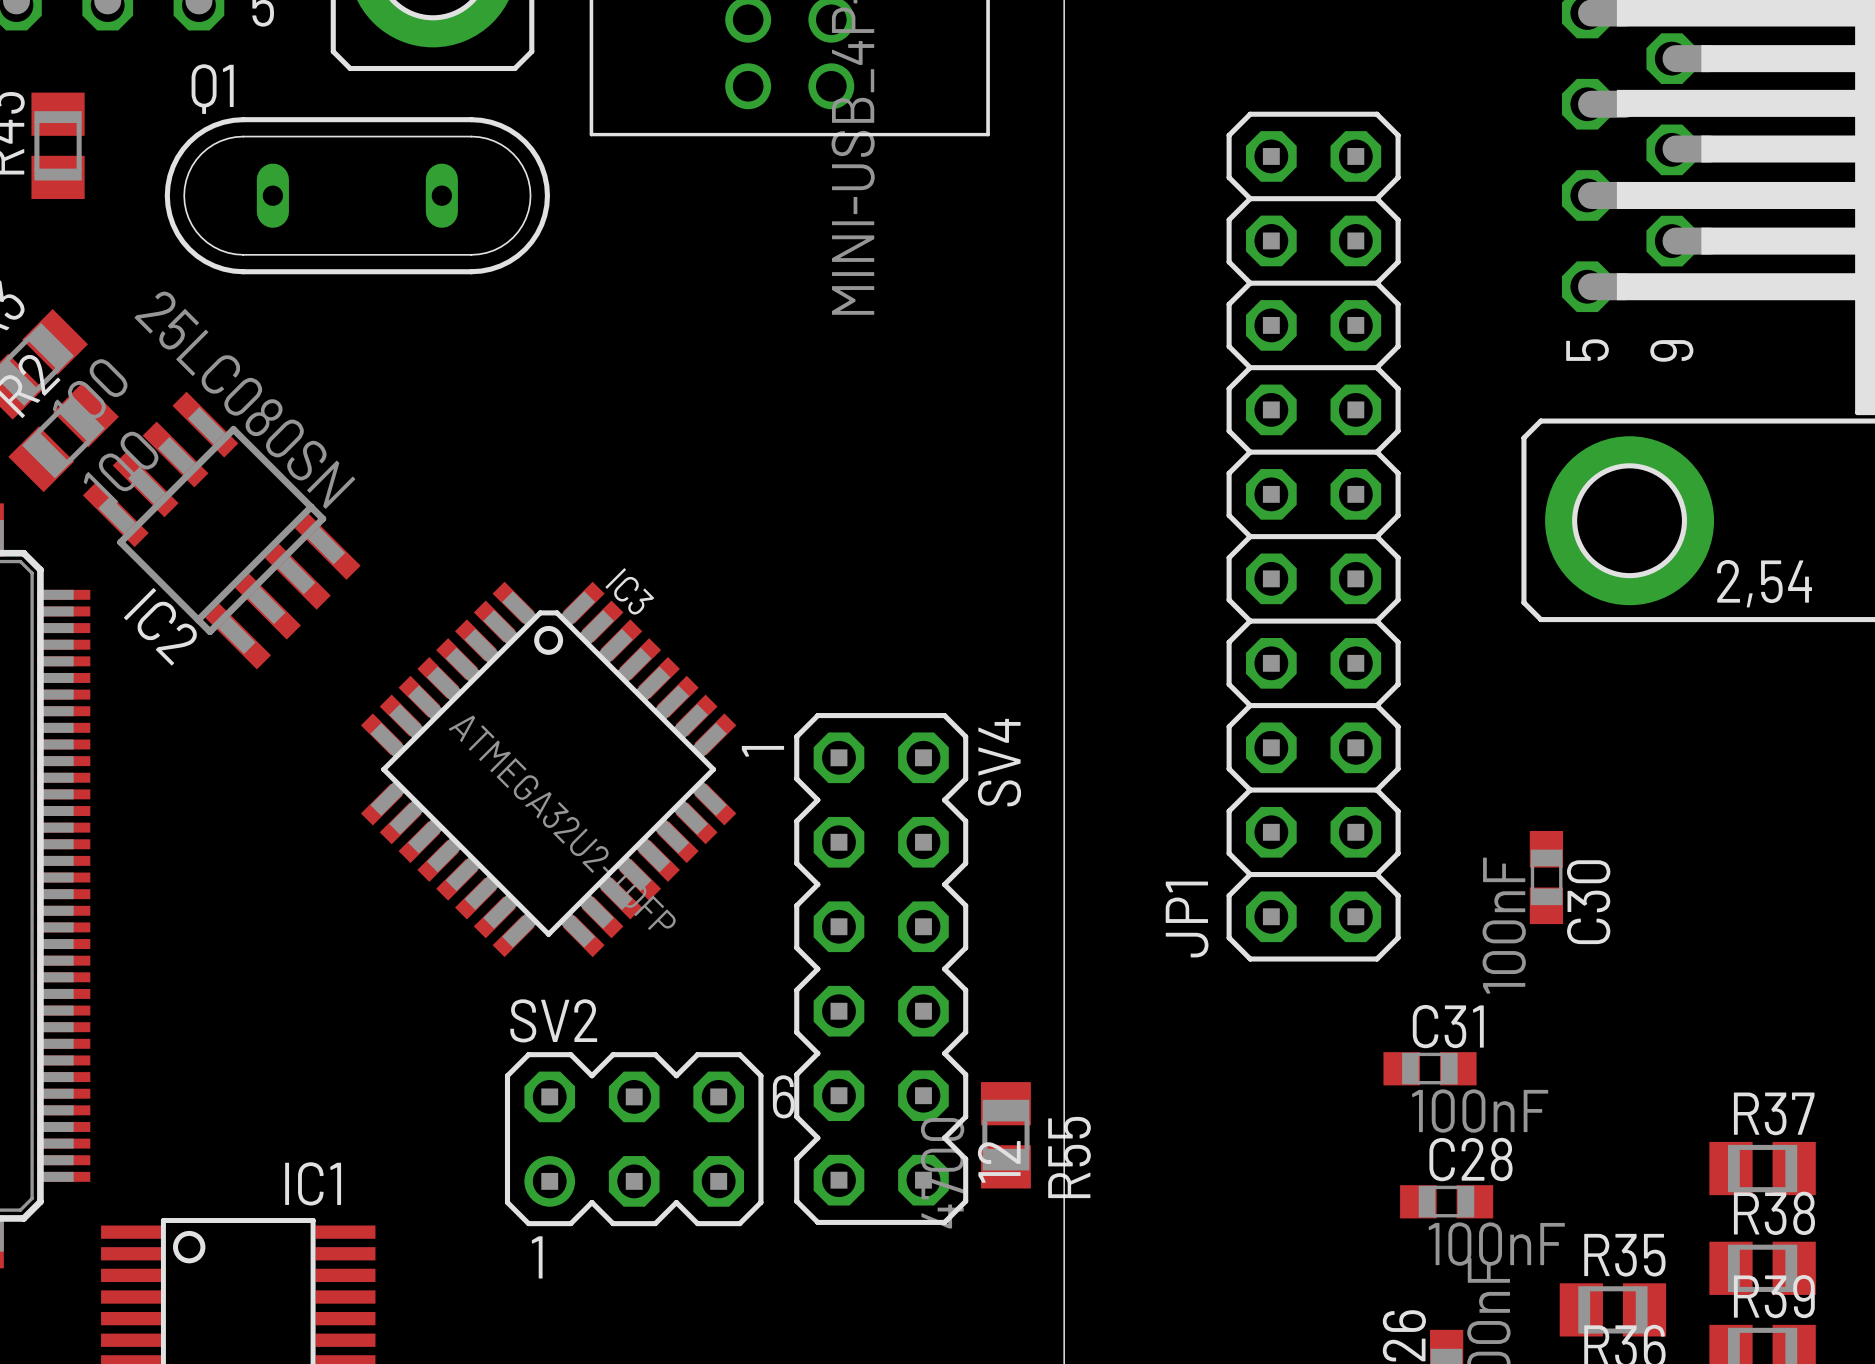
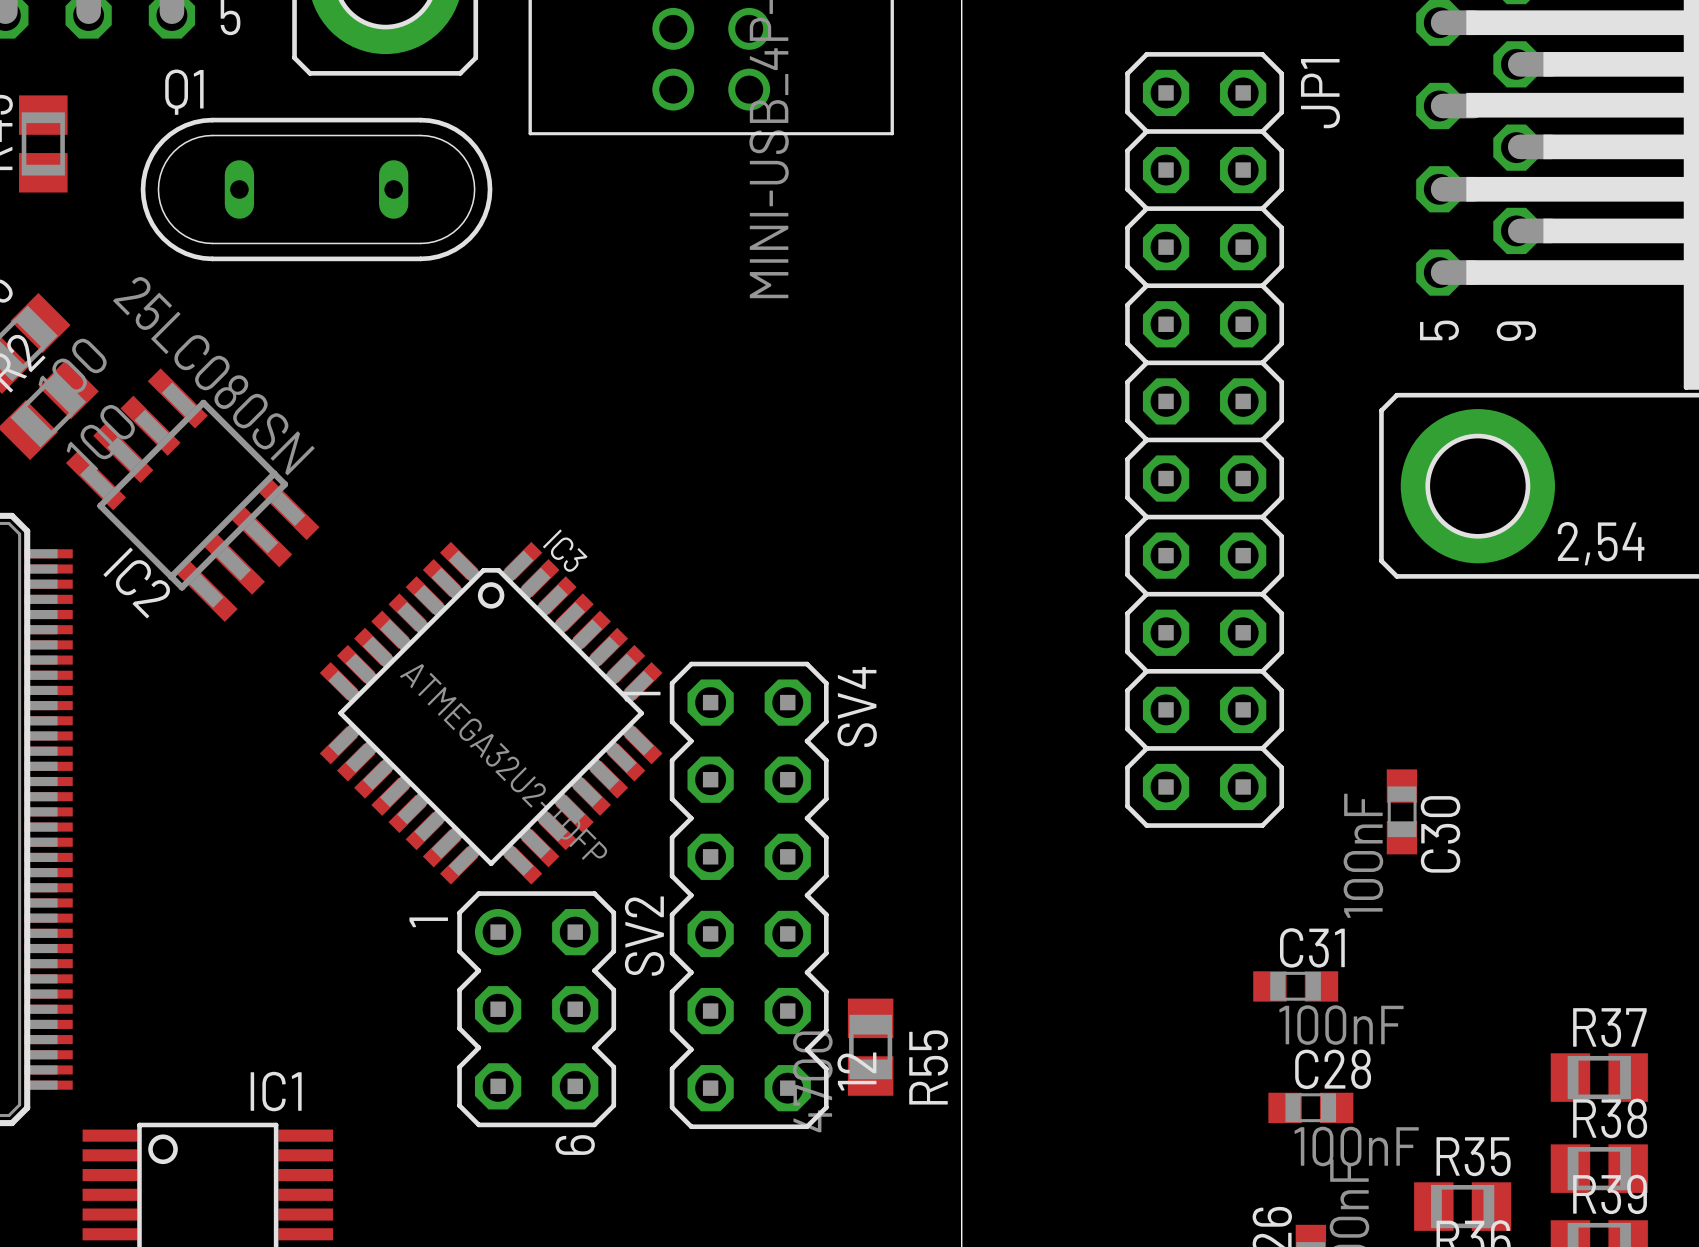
JP1 position: (1313, 536) -> (1204, 439)
JP1 name position: JP1 (1187, 919) -> JP1 (1320, 93)
SV4 position: (881, 968) -> (749, 895)
SV2 name position: SV2 (553, 1020) -> SV2 (644, 936)
SV2 footprint: [504, 1052, 764, 1227] -> [457, 891, 617, 1128]
R55 position: (1005, 1135) -> (870, 1047)

